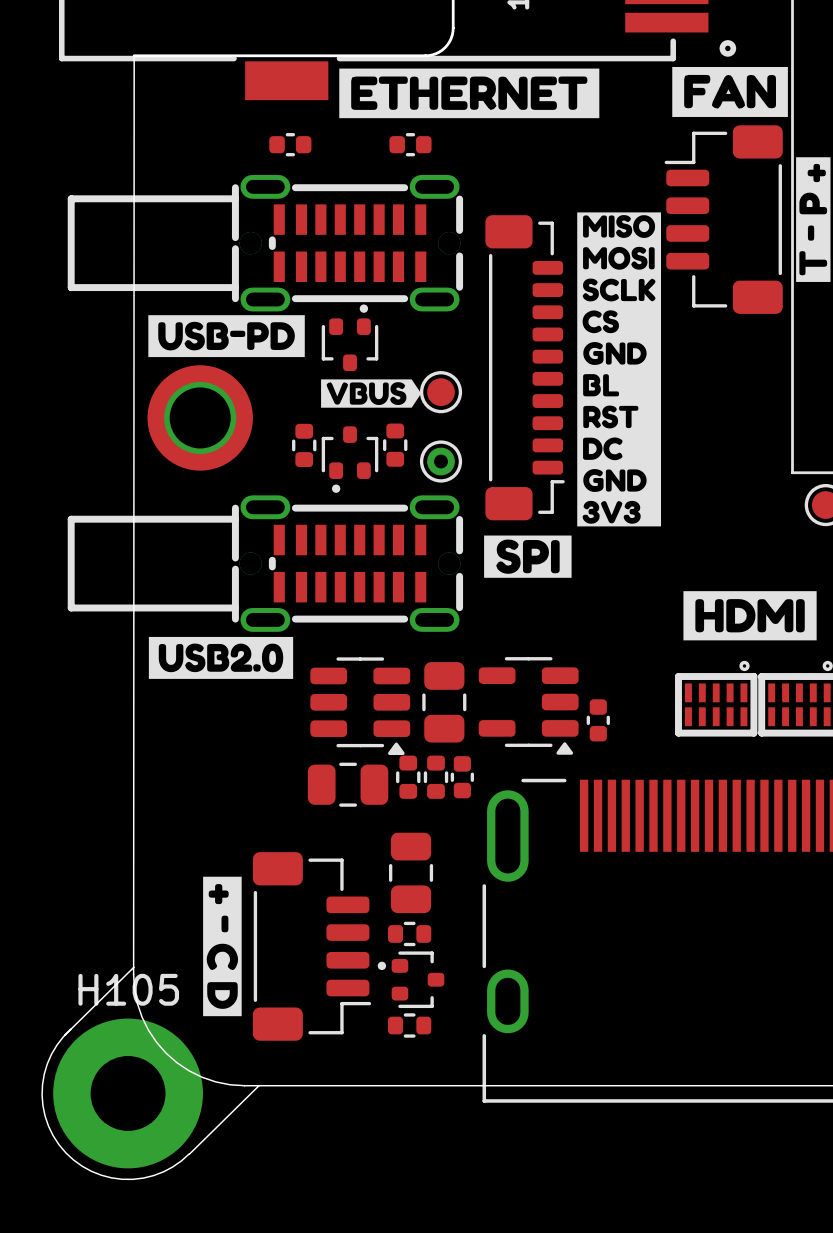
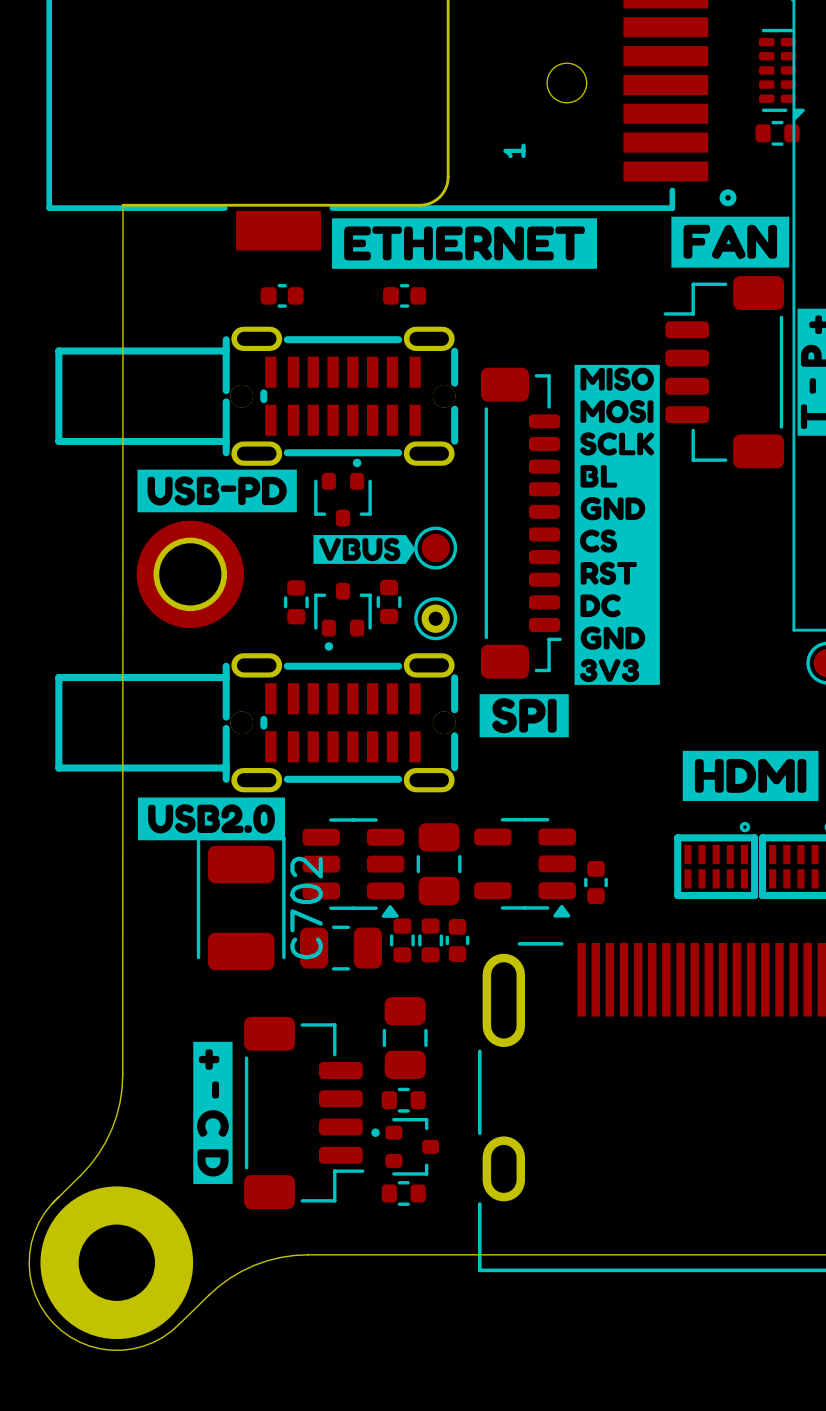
board edge: (134, 55) (134, 989) (142, 1017) (156, 1042) (177, 1062) (189, 1070) (202, 1077) (230, 1084) (315, 1085) -> (123, 205) (122, 1074) (119, 1102) (111, 1129) (98, 1154) (80, 1175)
drawing shape: [577, 212, 661, 527] -> [574, 364, 660, 685]
C702: none -> (241, 903)
board edge: (133, 967) (92, 1007) -> none
H105 name: H105 (128, 989) -> none
board edge: (259, 1085) (189, 1153) -> (307, 1254) (267, 1260) (242, 1271) (219, 1286) (179, 1324)

